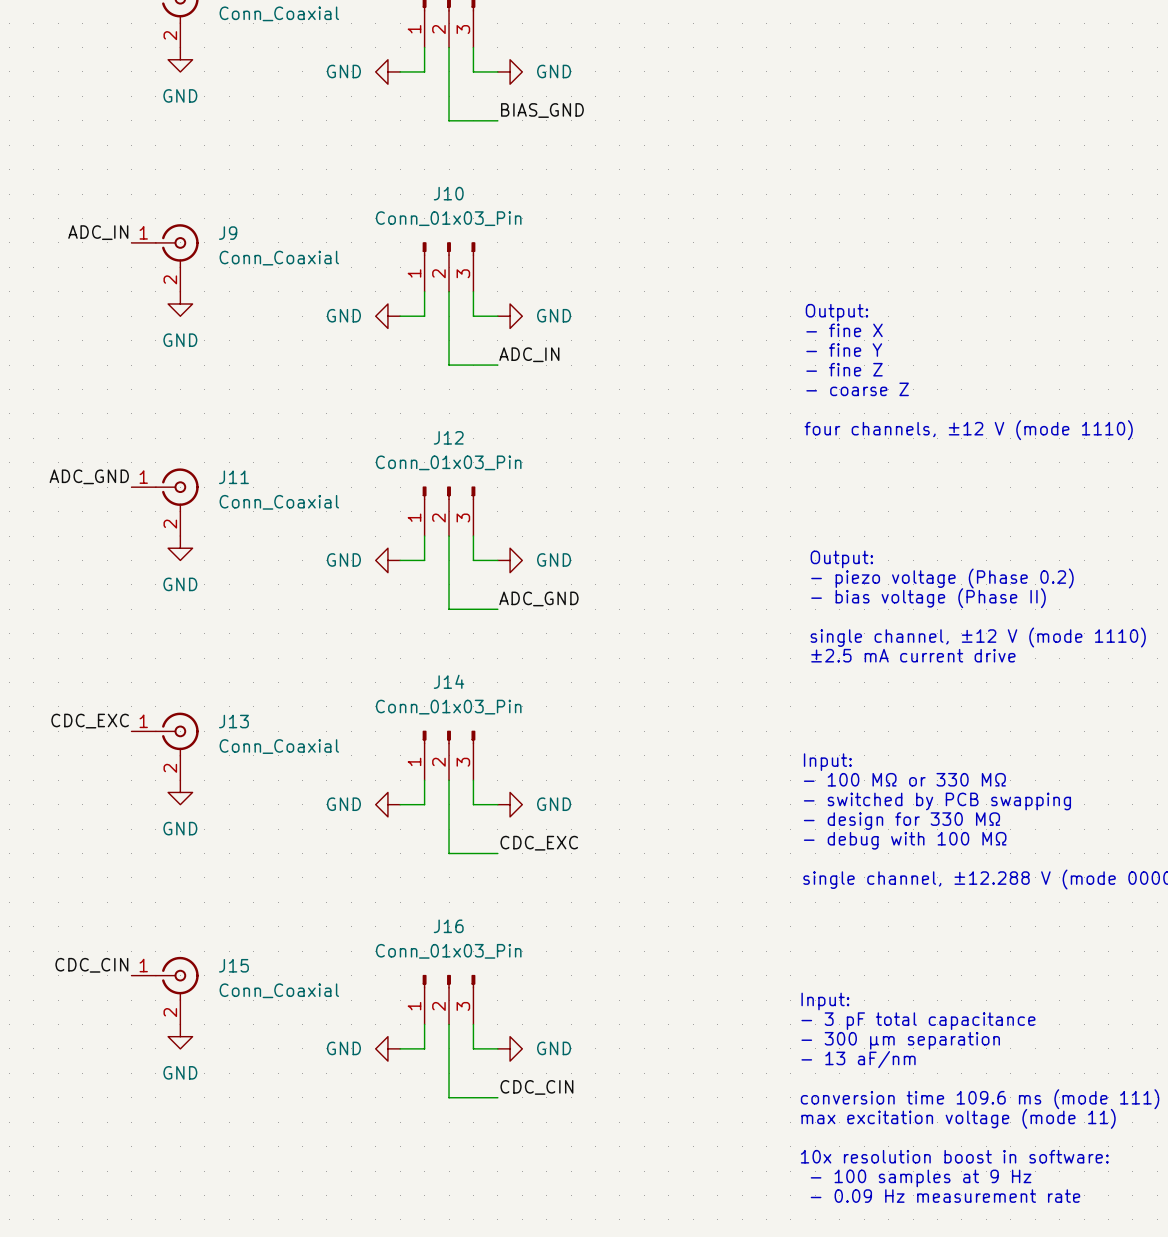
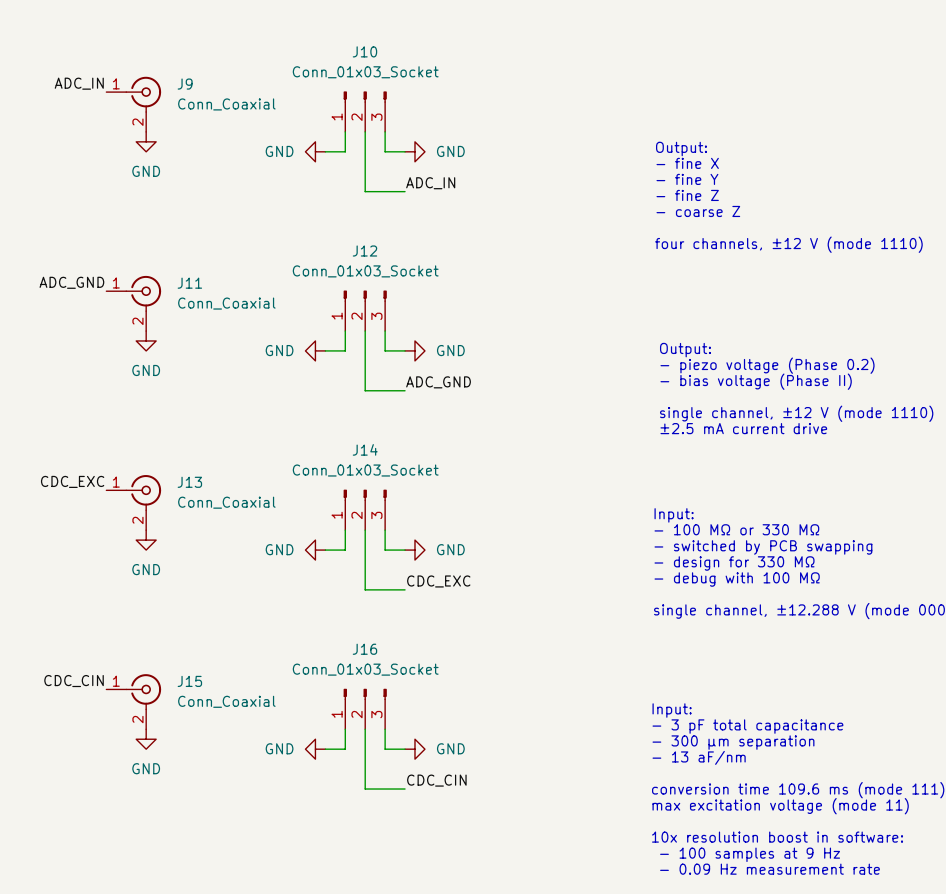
J10 value: Conn_01x03_Pin (448, 218) -> Conn_01x03_Socket (365, 72)
J12 value: Conn_01x03_Pin (448, 462) -> Conn_01x03_Socket (365, 271)
J14 value: Conn_01x03_Pin (448, 707) -> Conn_01x03_Socket (365, 470)
J16 value: Conn_01x03_Pin (448, 951) -> Conn_01x03_Socket (365, 669)

